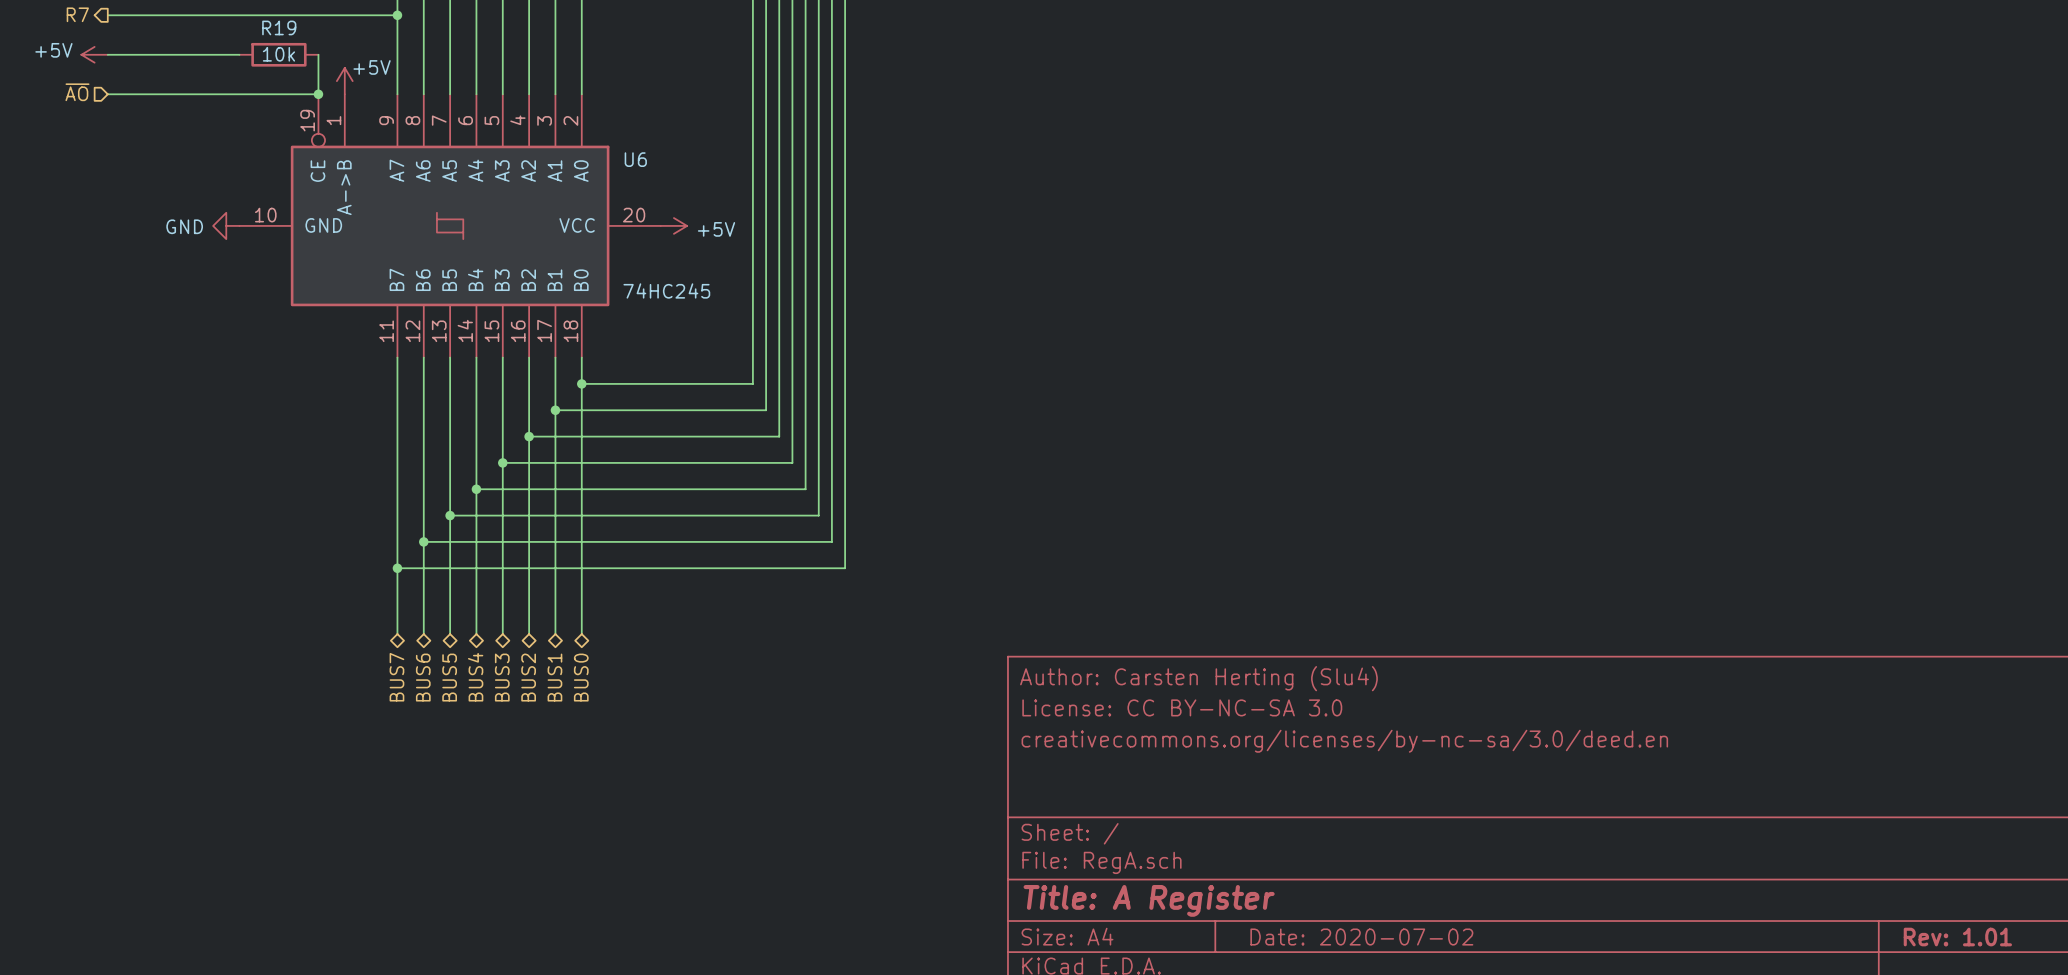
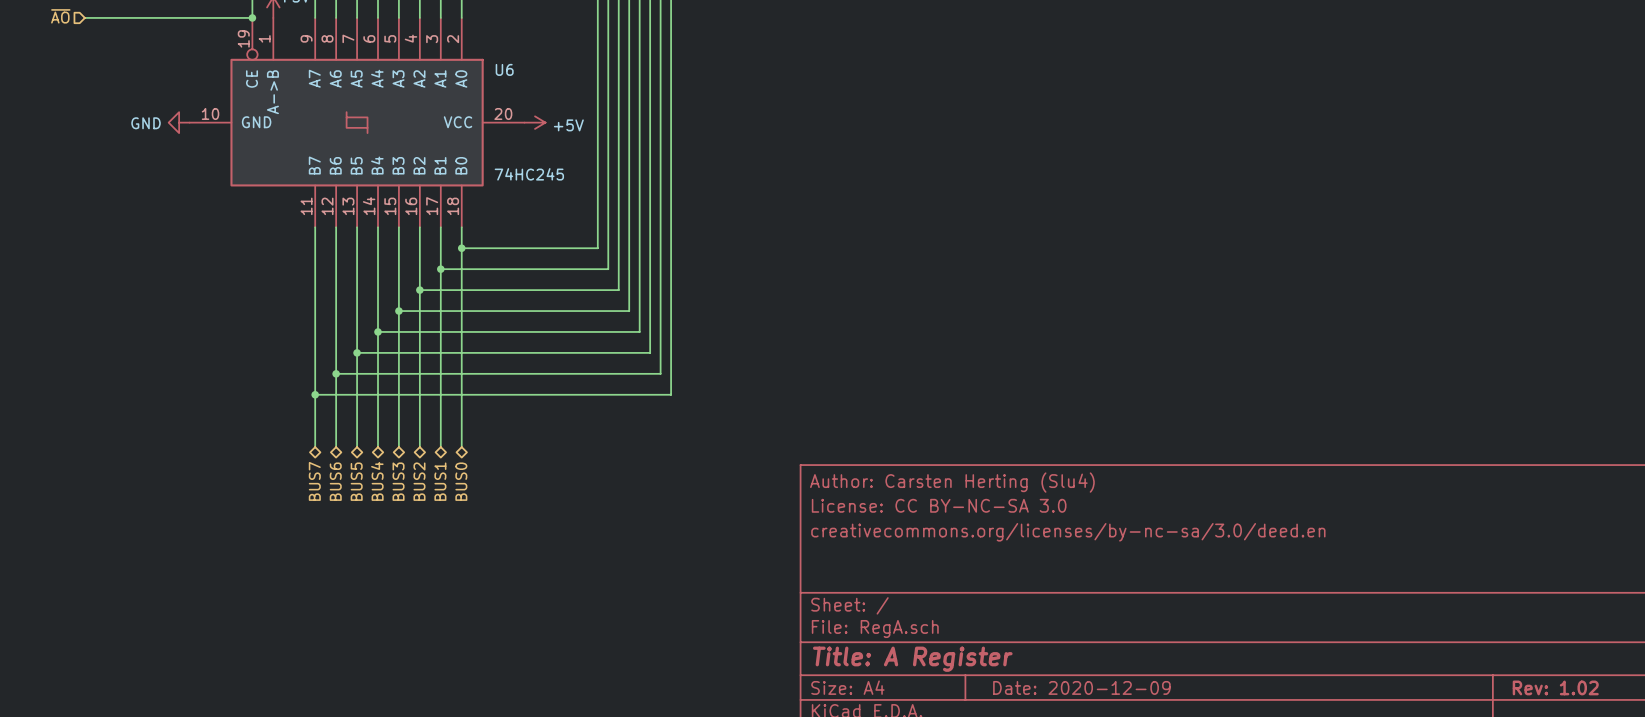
title block: Date: 2020-07-02 (1361, 937) -> Date: 2020-12-09 (1081, 687)
title block: Rev: 1.01 (1957, 937) -> Rev: 1.02 (1555, 687)

